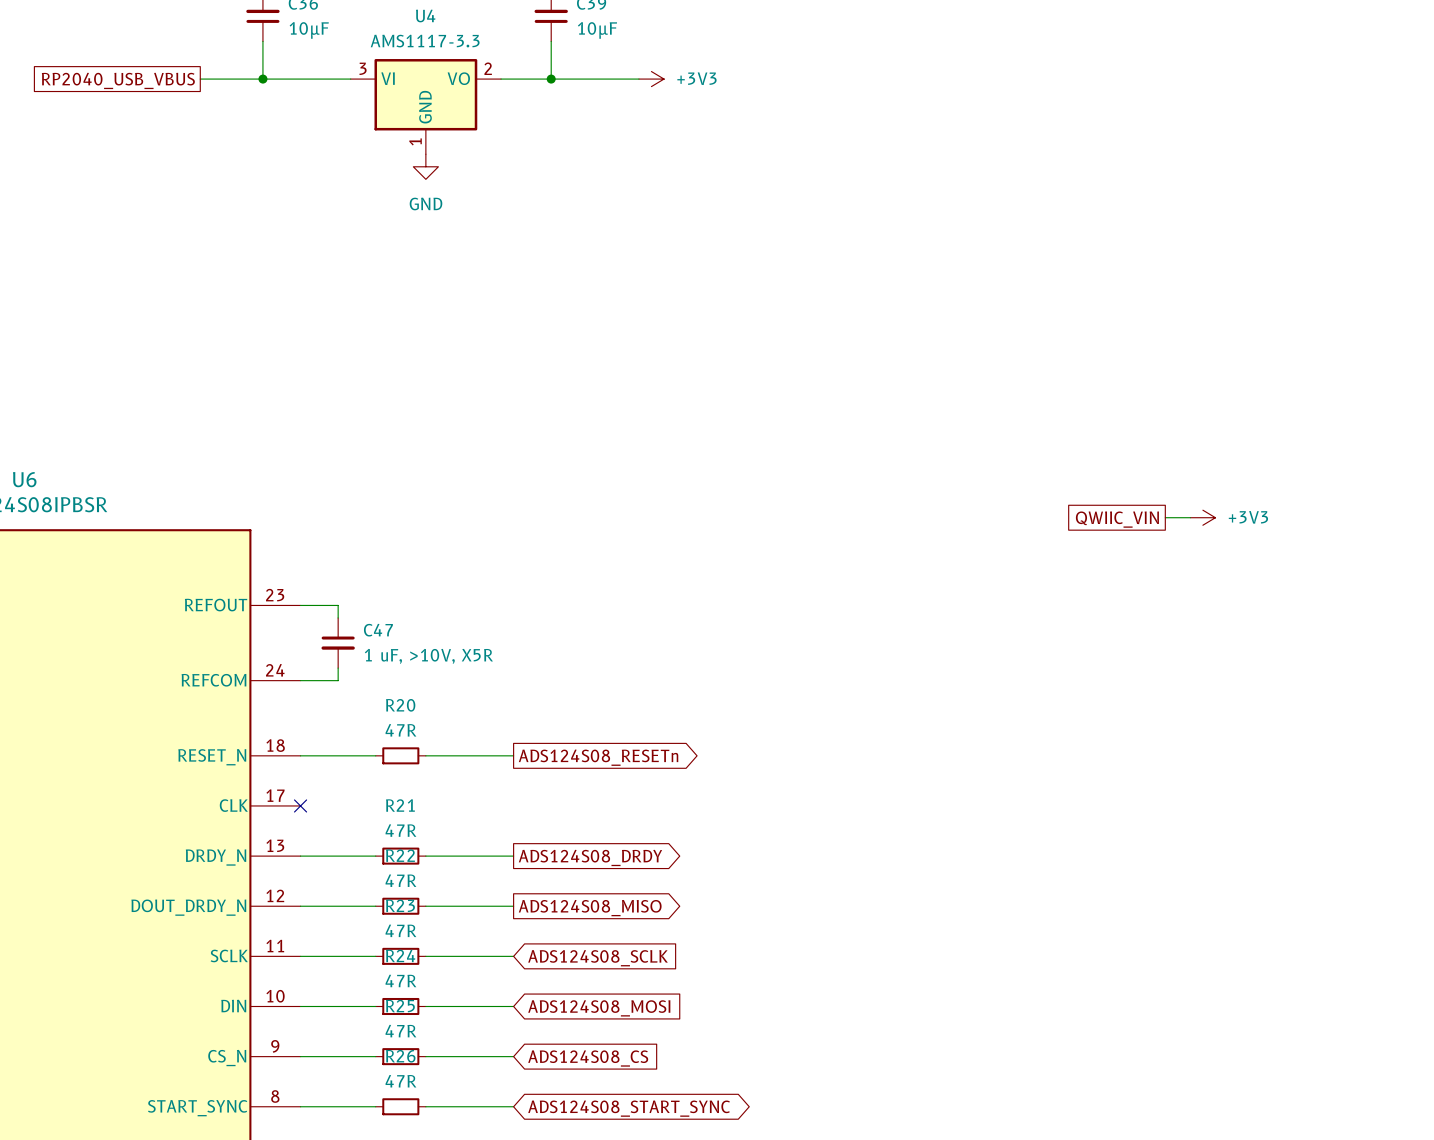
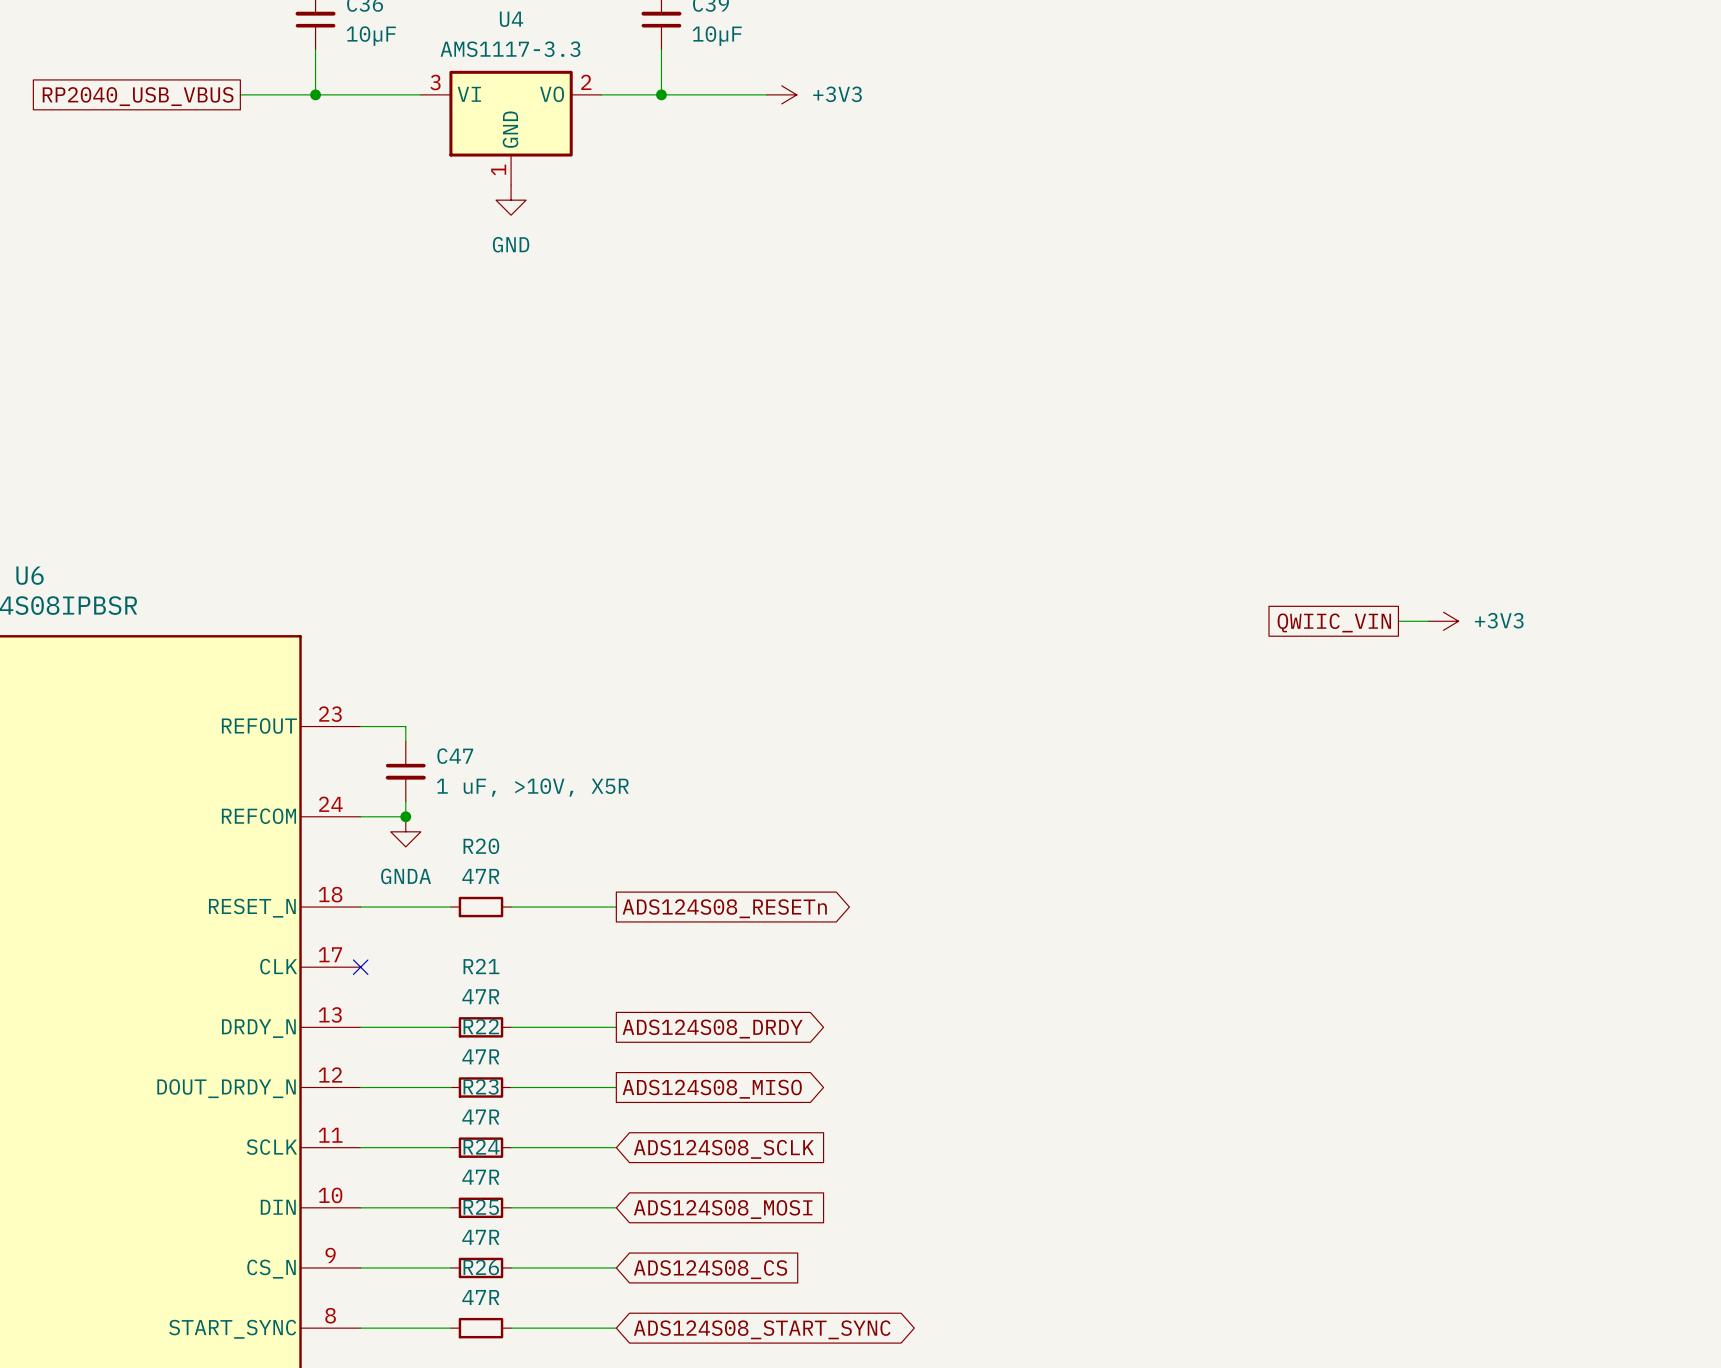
junction: none -> (405, 816)
power symbol: none -> GNDA (405, 831)

